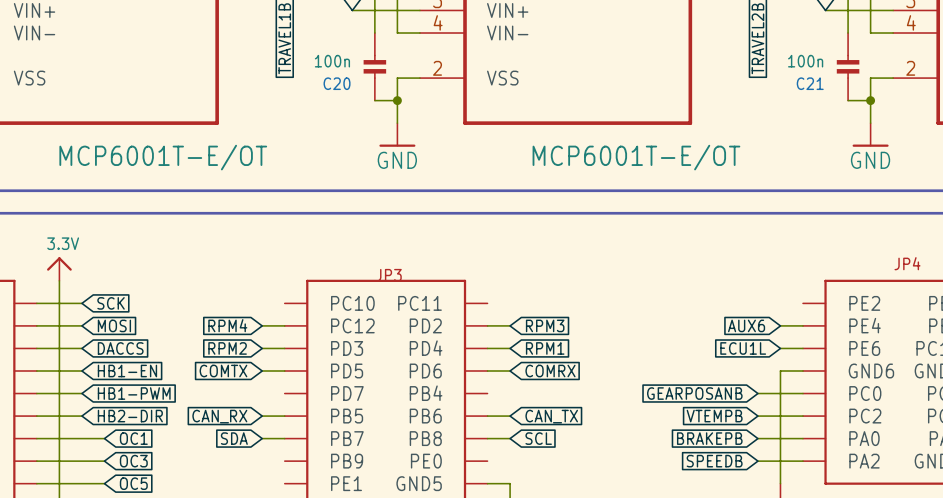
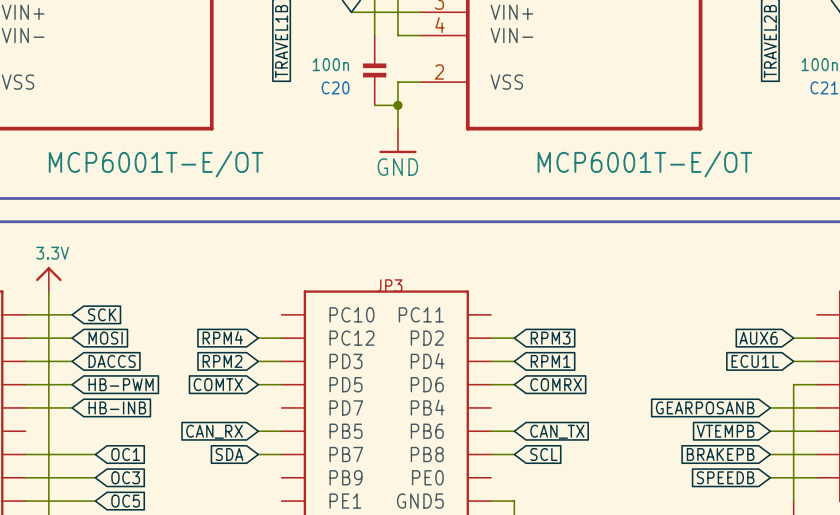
global label: HB1-EN (127, 371) -> HB-PWM (121, 384)
global label: HB1-PWM (134, 393) -> HB-INB (117, 407)
wire: (36, 416) (81, 416) -> none
global label: HB2-DIR (130, 416) -> none

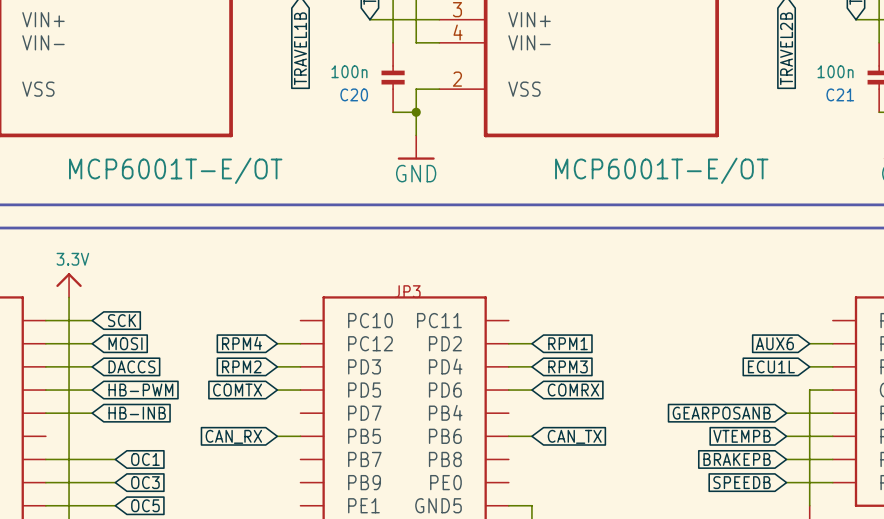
global label: RPM3 (550, 338) -> RPM1 (568, 343)
global label: RPM1 (550, 361) -> RPM3 (568, 366)
global label: SDA (229, 454) -> none
wire: (258, 454) (281, 454) -> none
wire: (491, 454) (514, 454) -> none
global label: SCL (543, 454) -> none

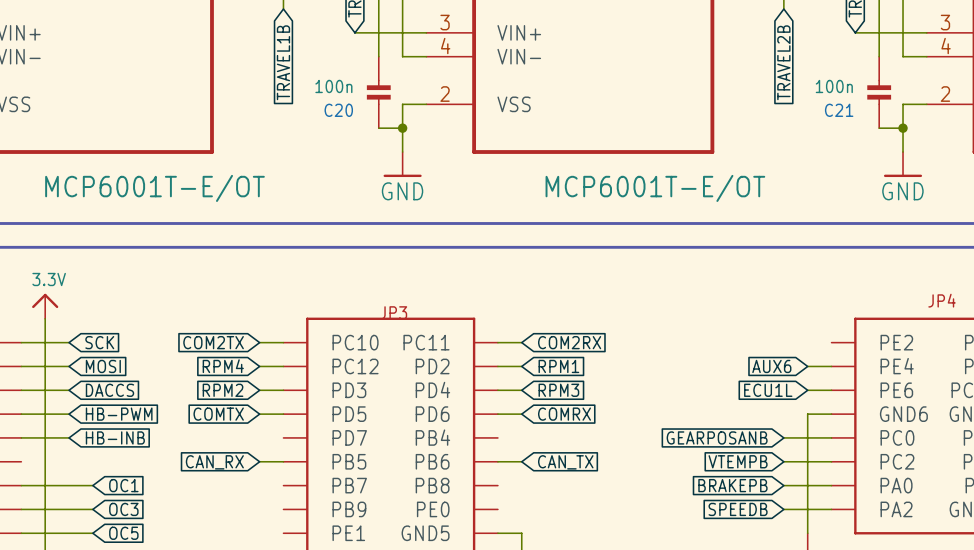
global label: none -> COM2TX (213, 342)
wire: none -> (259, 342) (283, 342)
wire: none -> (497, 342) (521, 342)
global label: none -> COM2RX (569, 342)

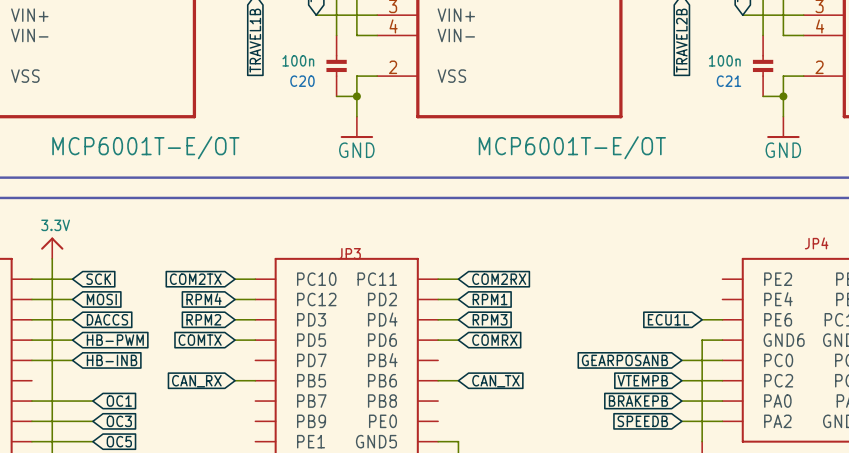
global label: AUX6 (771, 366) -> none
wire: (807, 366) (831, 366) -> none

